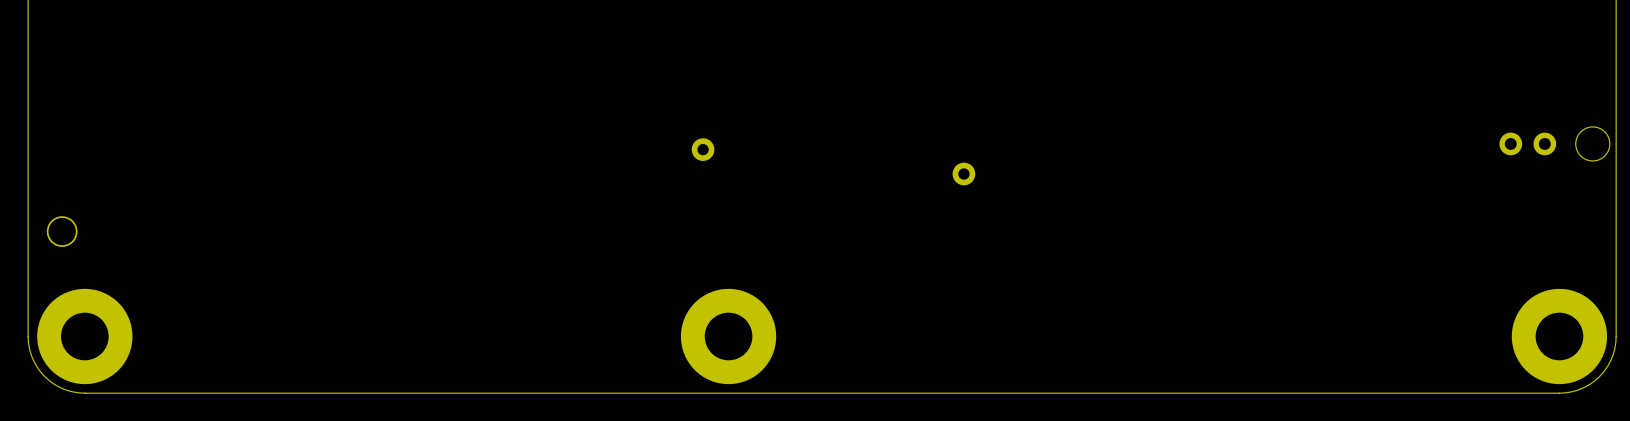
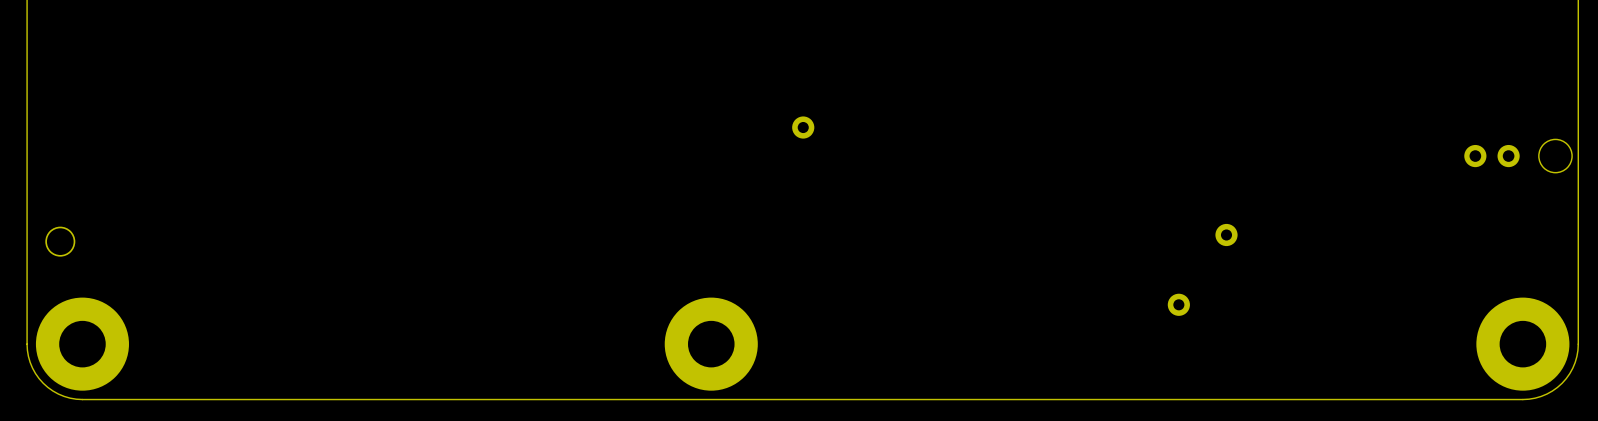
part: none -> (803, 127)
part: (703, 149) -> none
part: (963, 174) -> none
part: none -> (1226, 234)
part: none -> (1178, 304)

